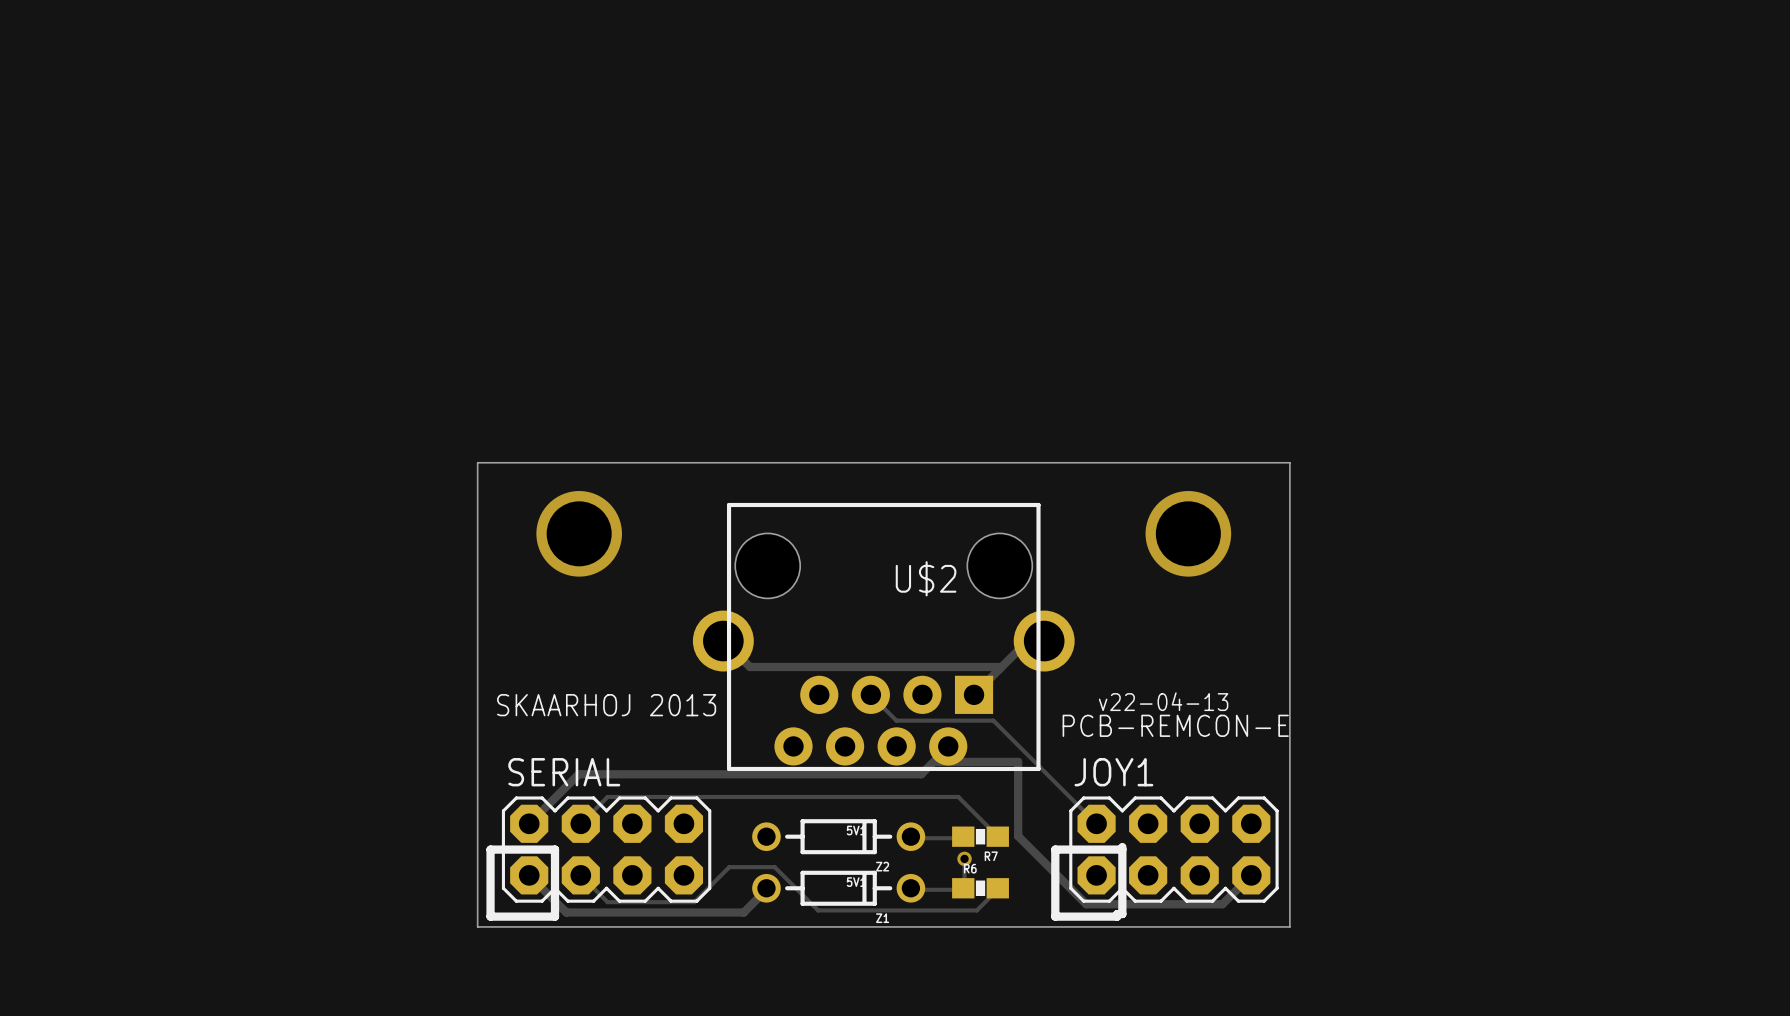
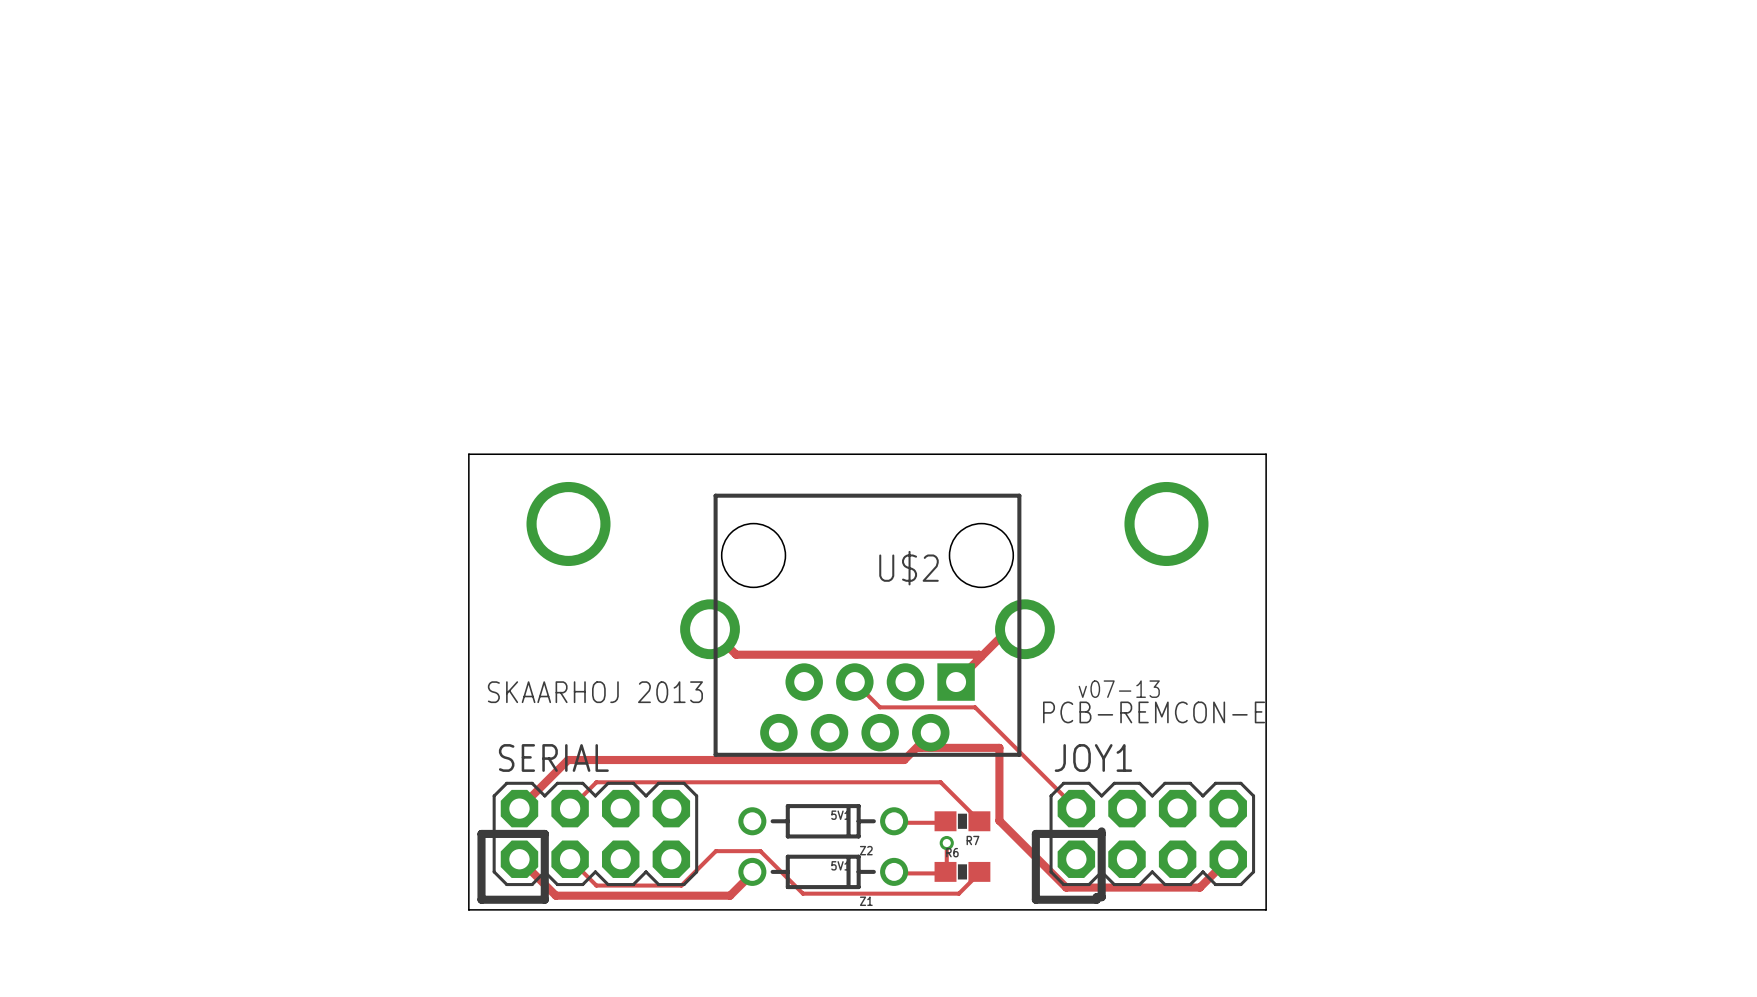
text: v22-04-13 (1163, 701) -> v07-13 (1119, 689)

